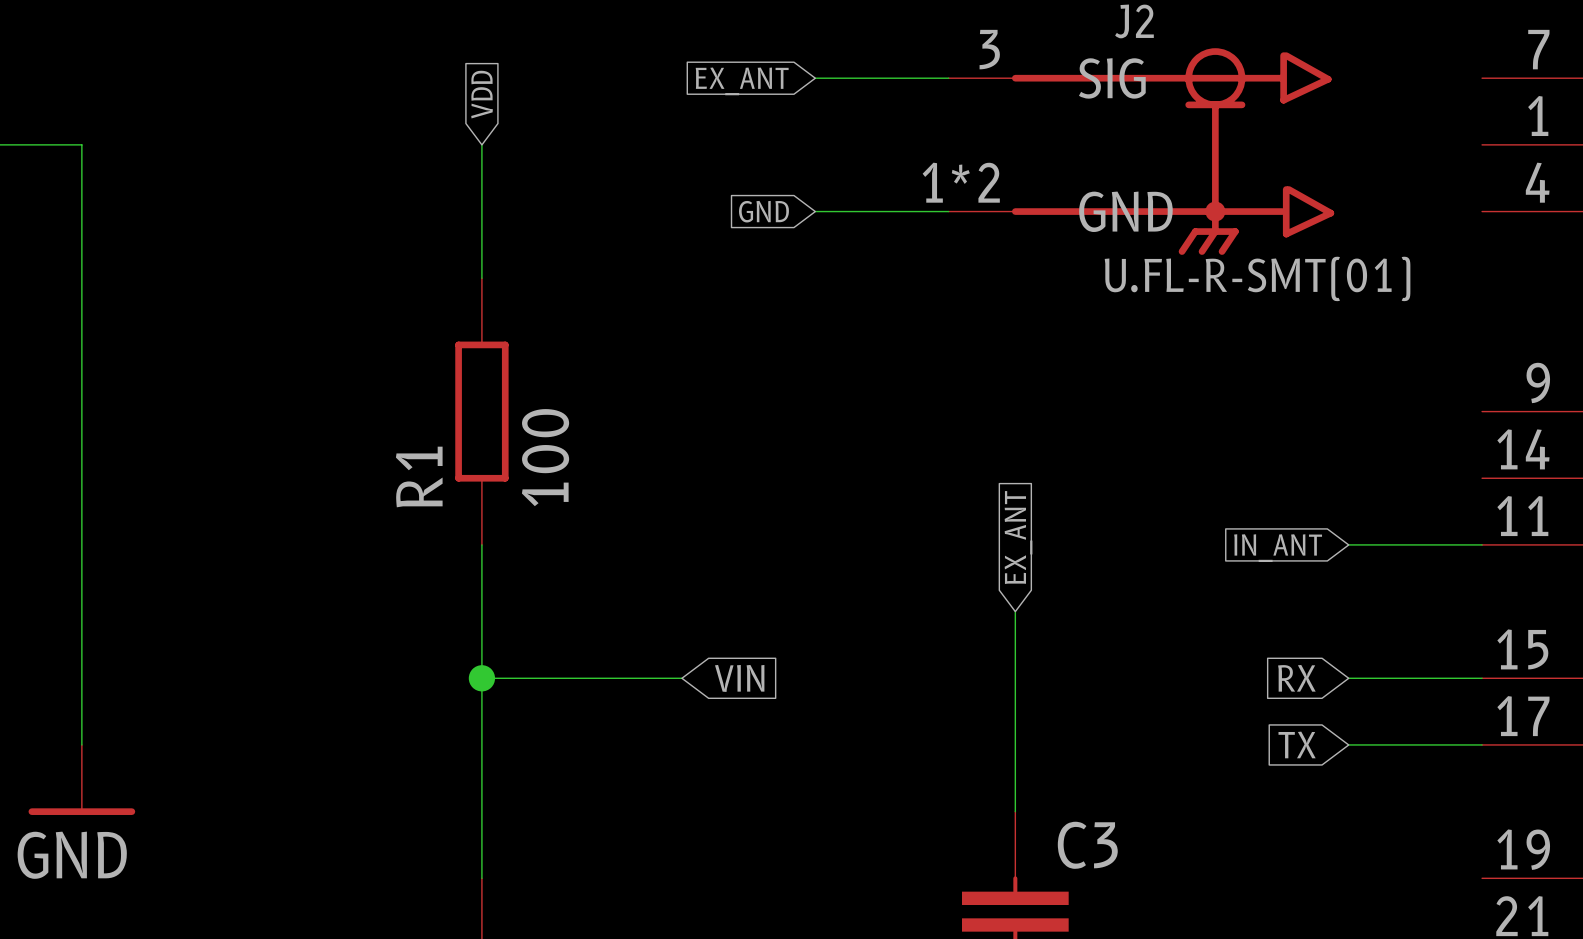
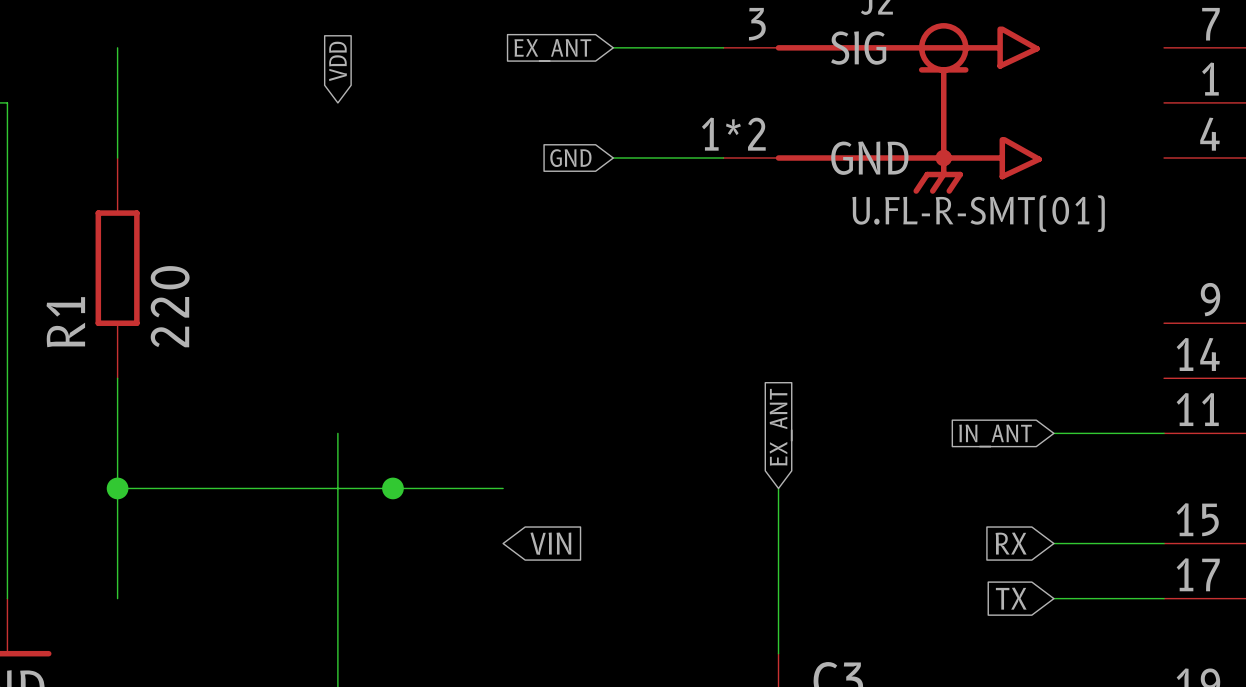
wire: (481, 144) (481, 278) -> (117, 47) (117, 158)
R1 position: (481, 411) -> (117, 268)
R1 value: 100 (545, 457) -> 220 (170, 306)
wire: none -> (117, 378) (117, 598)
wire: none -> (117, 488) (503, 488)
junction: none -> (117, 488)
wire: (481, 678) (681, 678) -> none
junction position: (481, 678) -> (392, 488)

